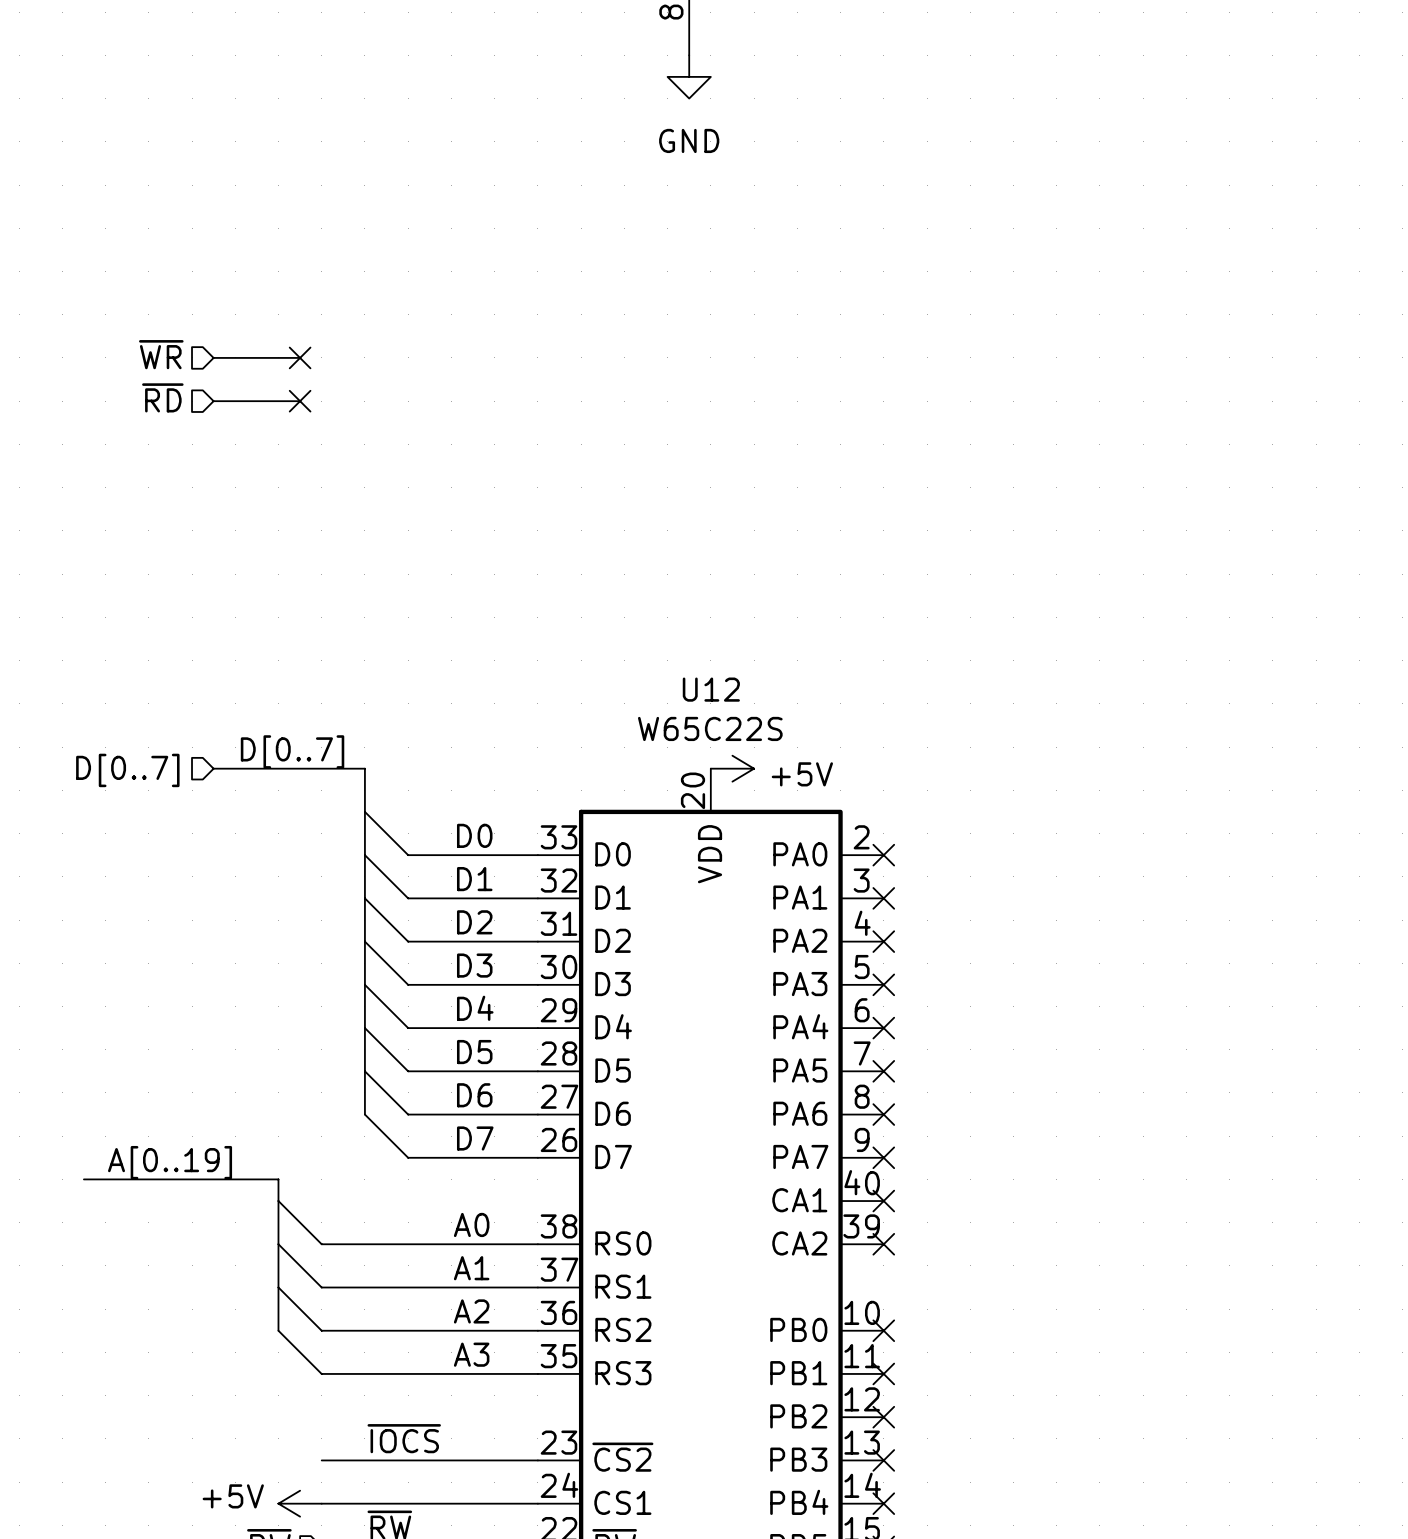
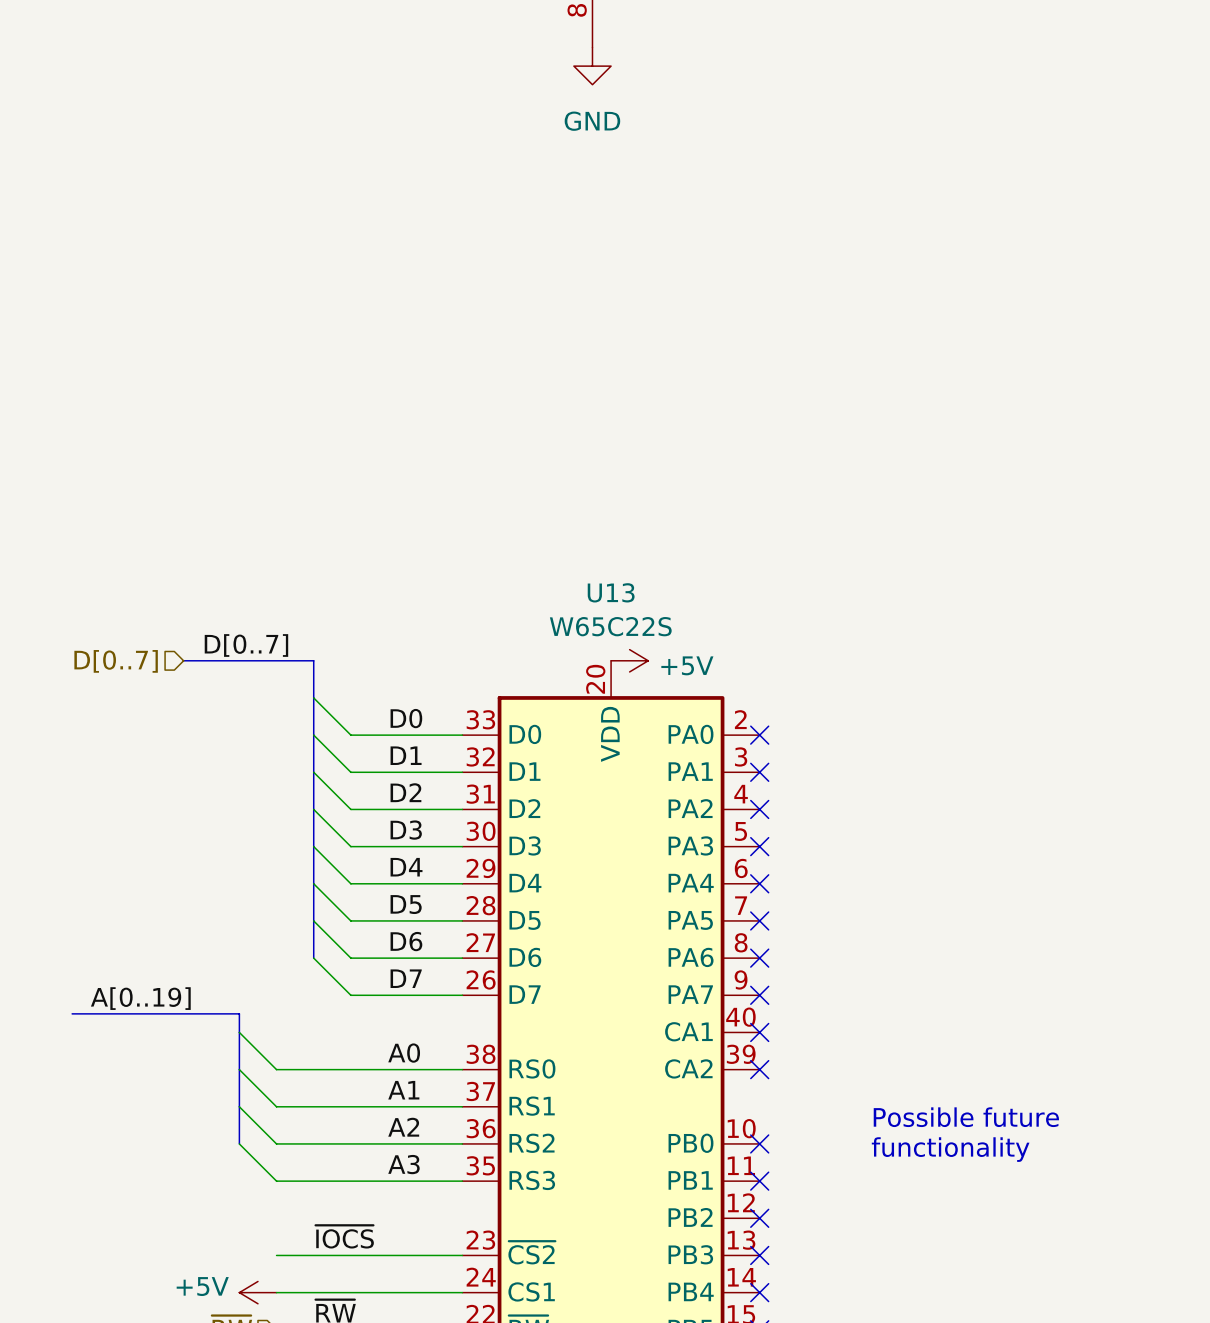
hierarchical label: ~{WR} (161, 354) -> none
wire: (213, 357) (300, 357) -> none
no-connect mark: (300, 357) -> none
hierarchical label: ~{RD} (162, 397) -> none
wire: (213, 401) (300, 401) -> none
no-connect mark: (300, 401) -> none
U12 name: U12 (711, 689) -> U13 (611, 592)
text: none -> Possible future (966, 1117)
text: none -> functionality (950, 1149)

